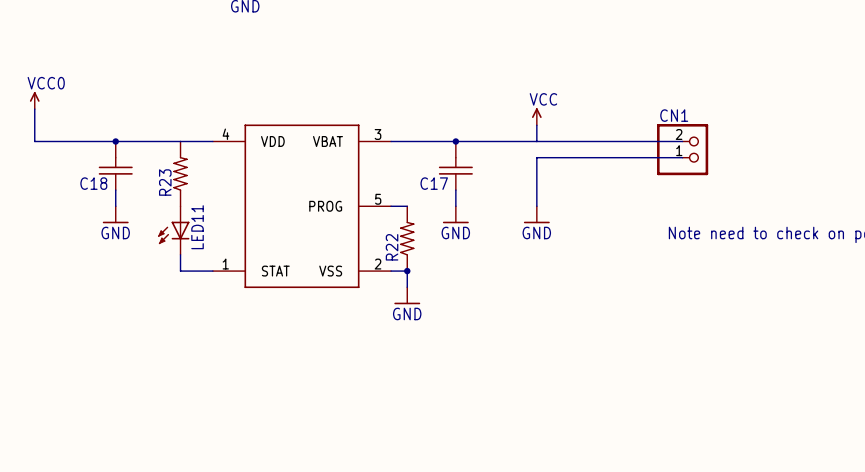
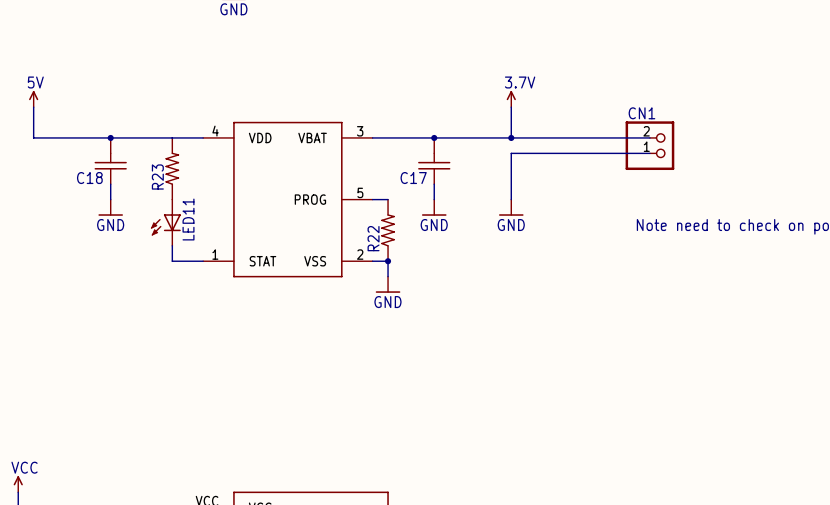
power symbol: VCC0 (34, 100) -> 5V (33, 99)
power symbol: none -> 3.7V (511, 99)
power symbol: VCC (536, 116) -> none
junction: none -> (511, 137)

